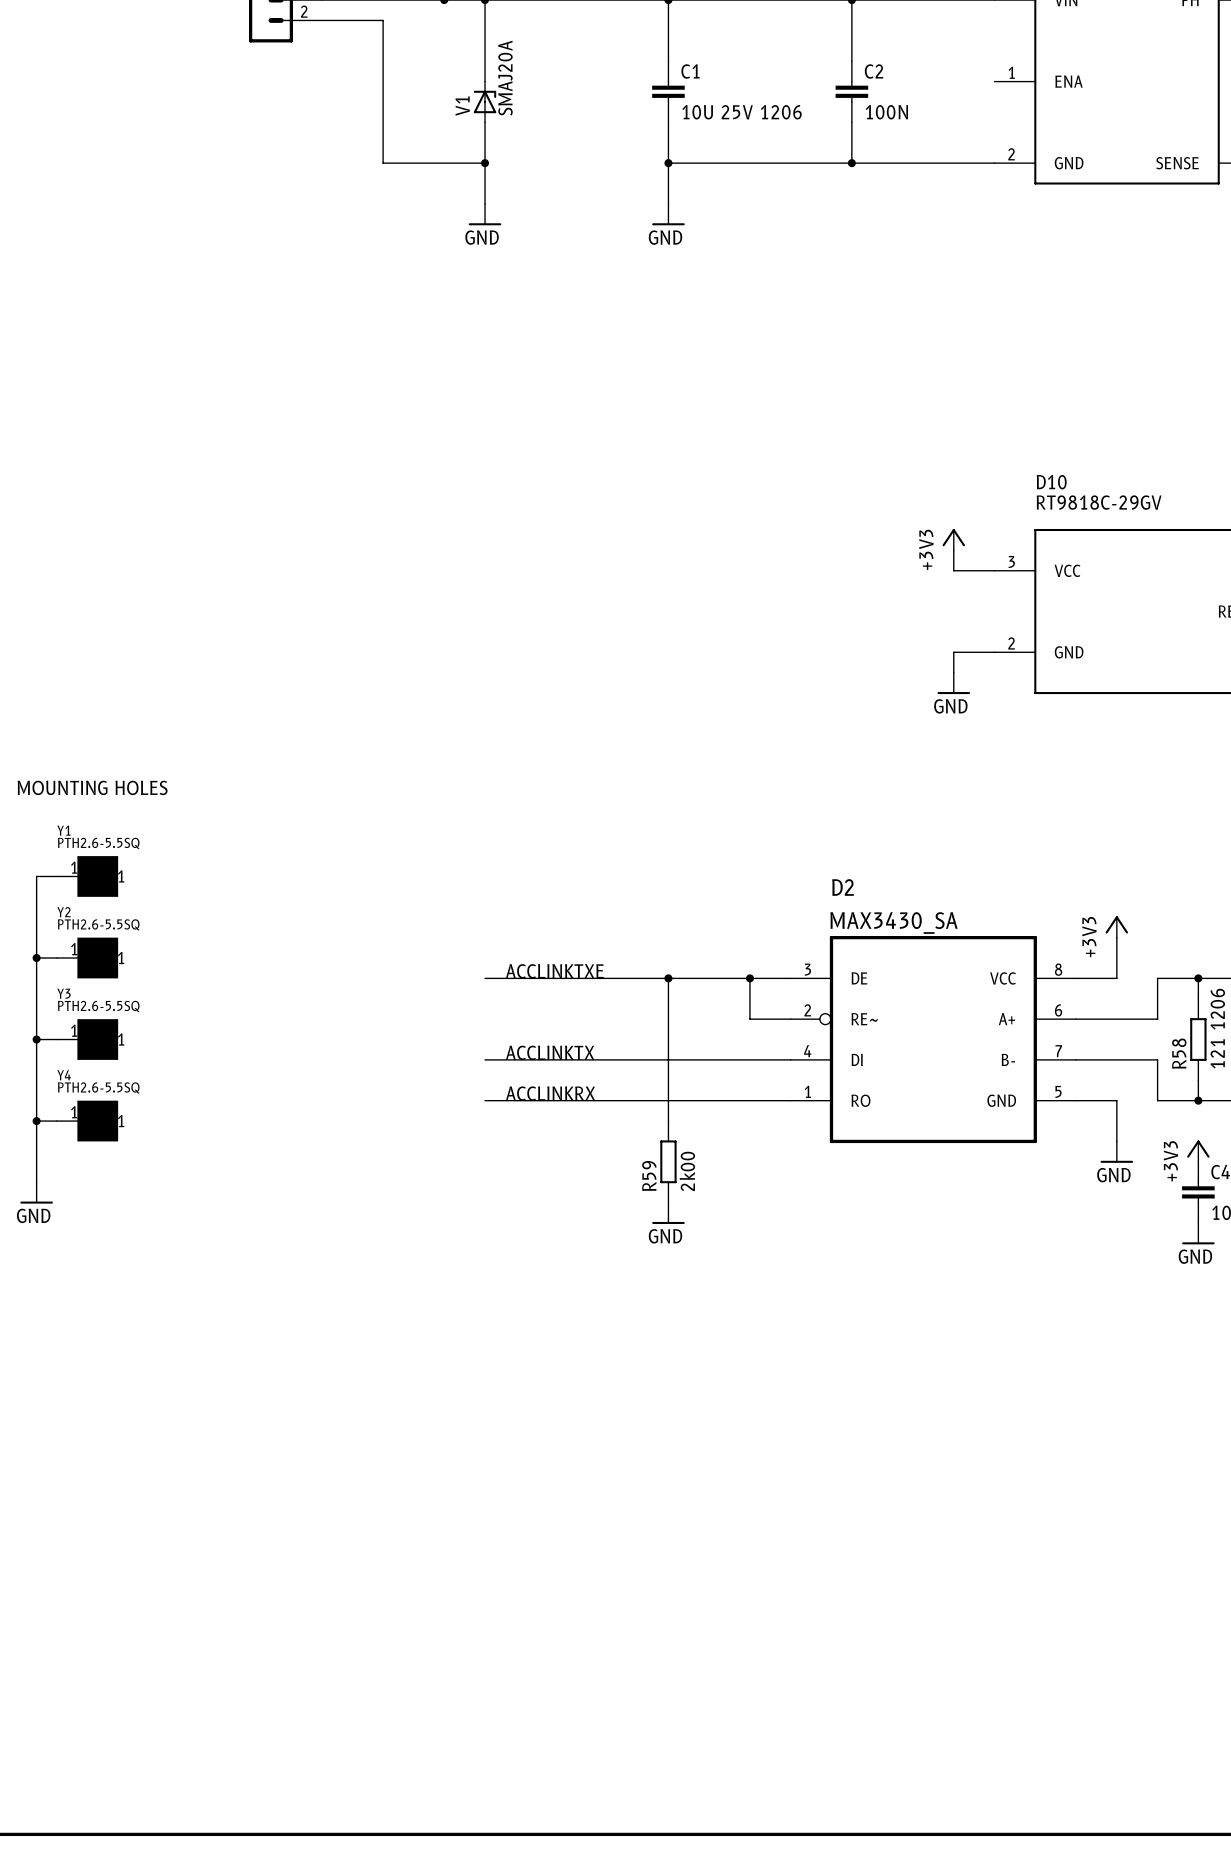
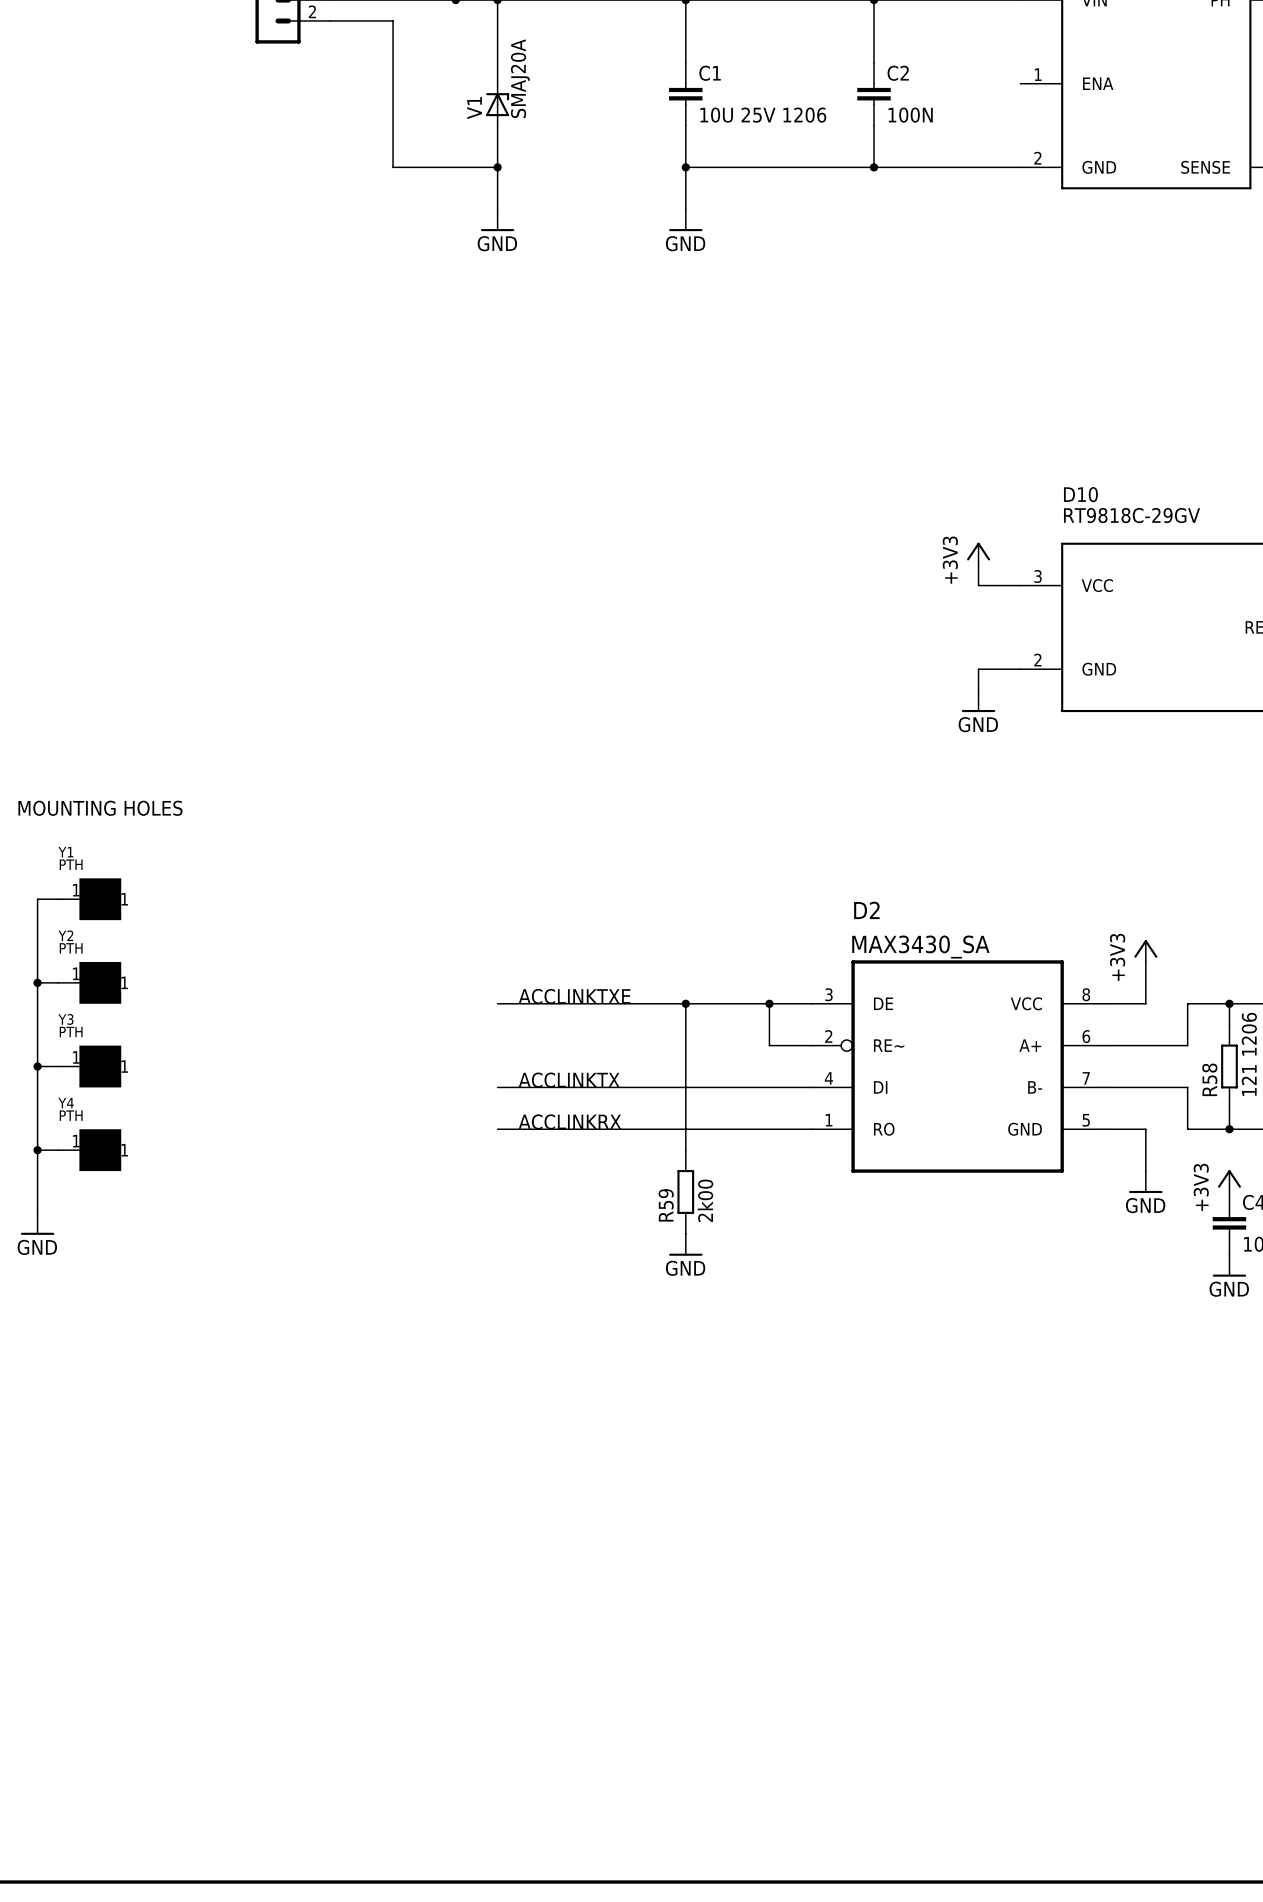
Y1 value: PTH2.6-5.5SQ (98, 843) -> PTH (71, 864)
Y2 value: PTH2.6-5.5SQ (98, 924) -> PTH (71, 948)
Y3 value: PTH2.6-5.5SQ (98, 1006) -> PTH (71, 1032)
Y4 value: PTH2.6-5.5SQ (98, 1087) -> PTH (71, 1115)

